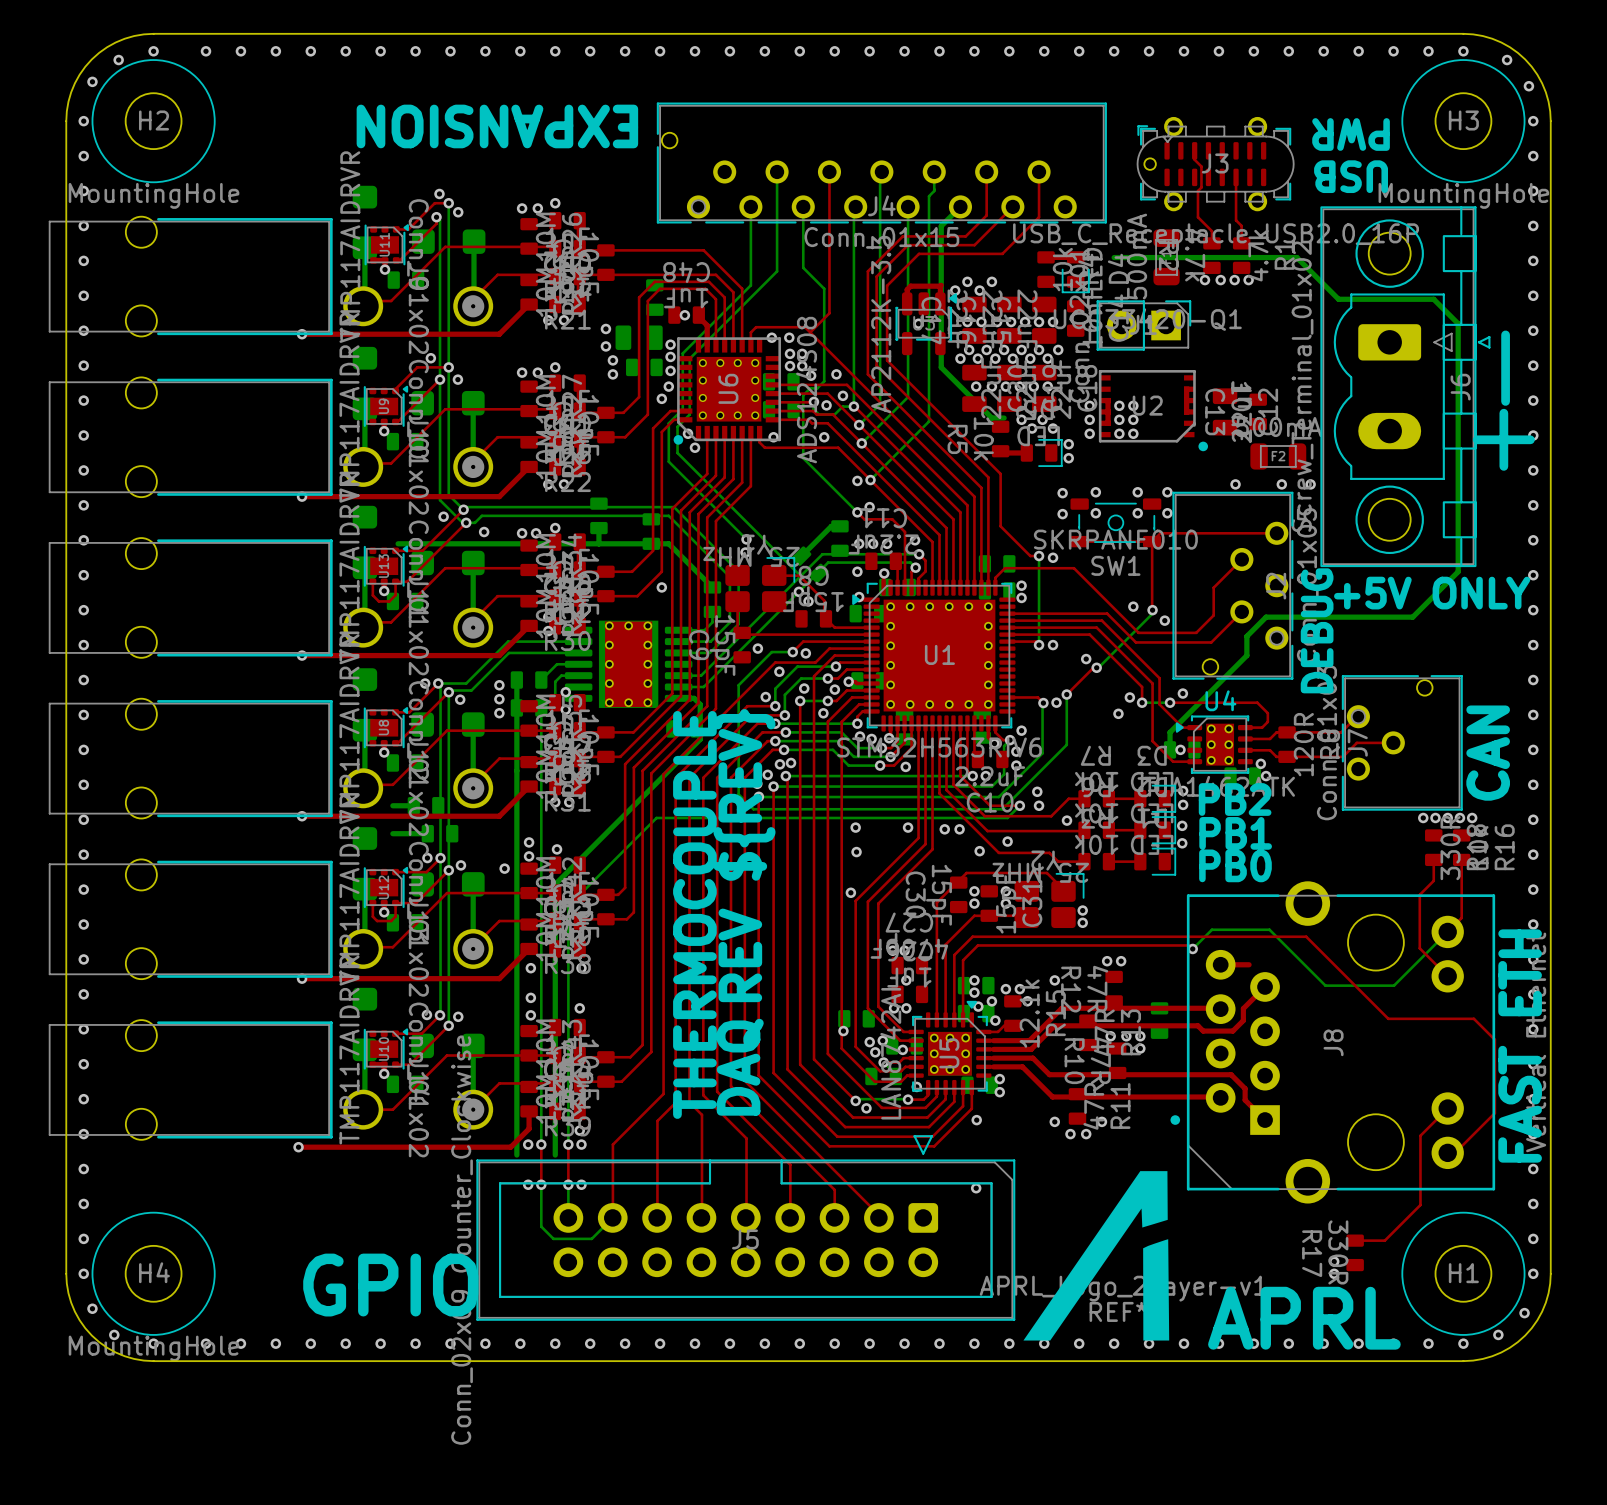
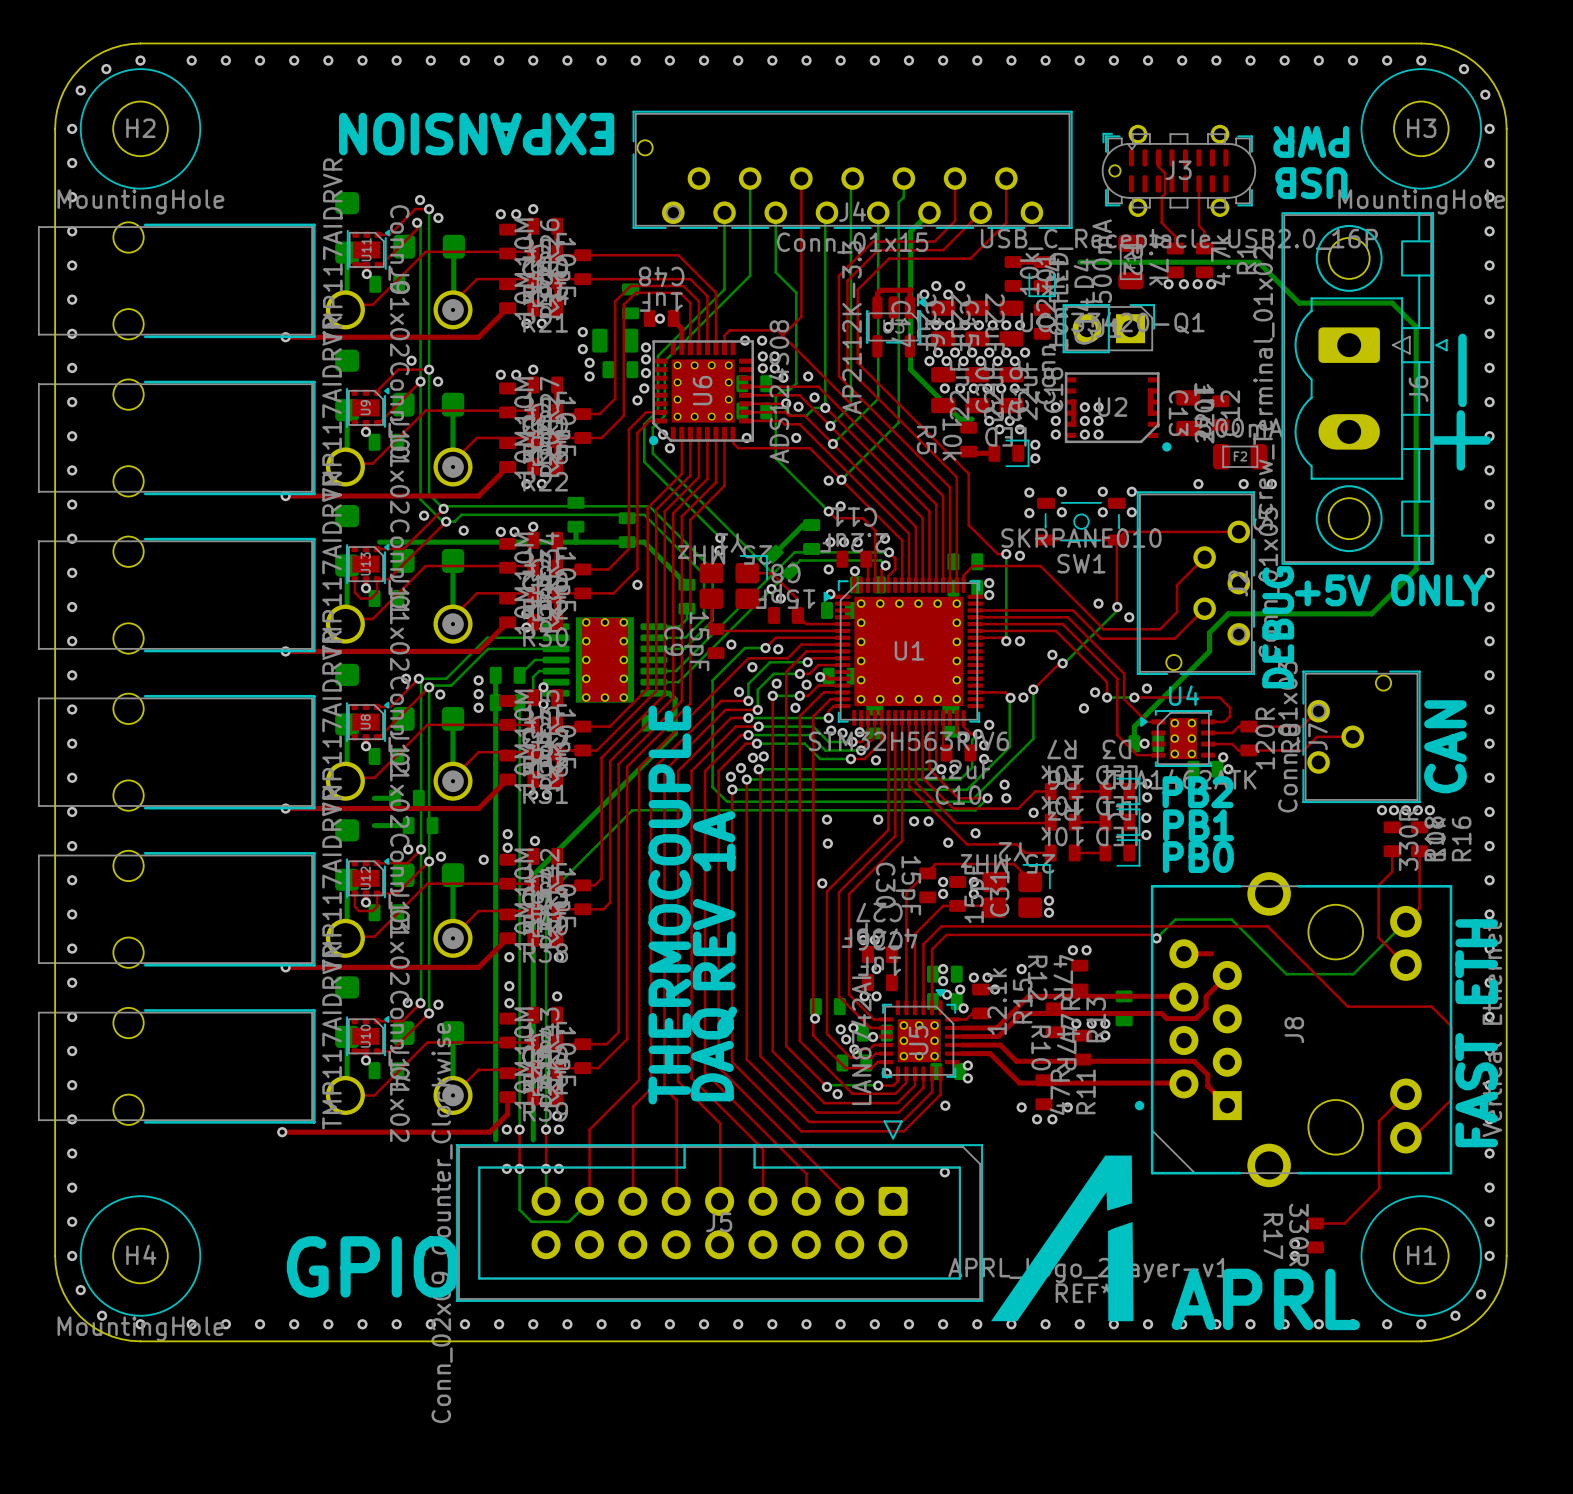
text: REV ${REV} (744, 855) -> REV 1A (714, 900)

